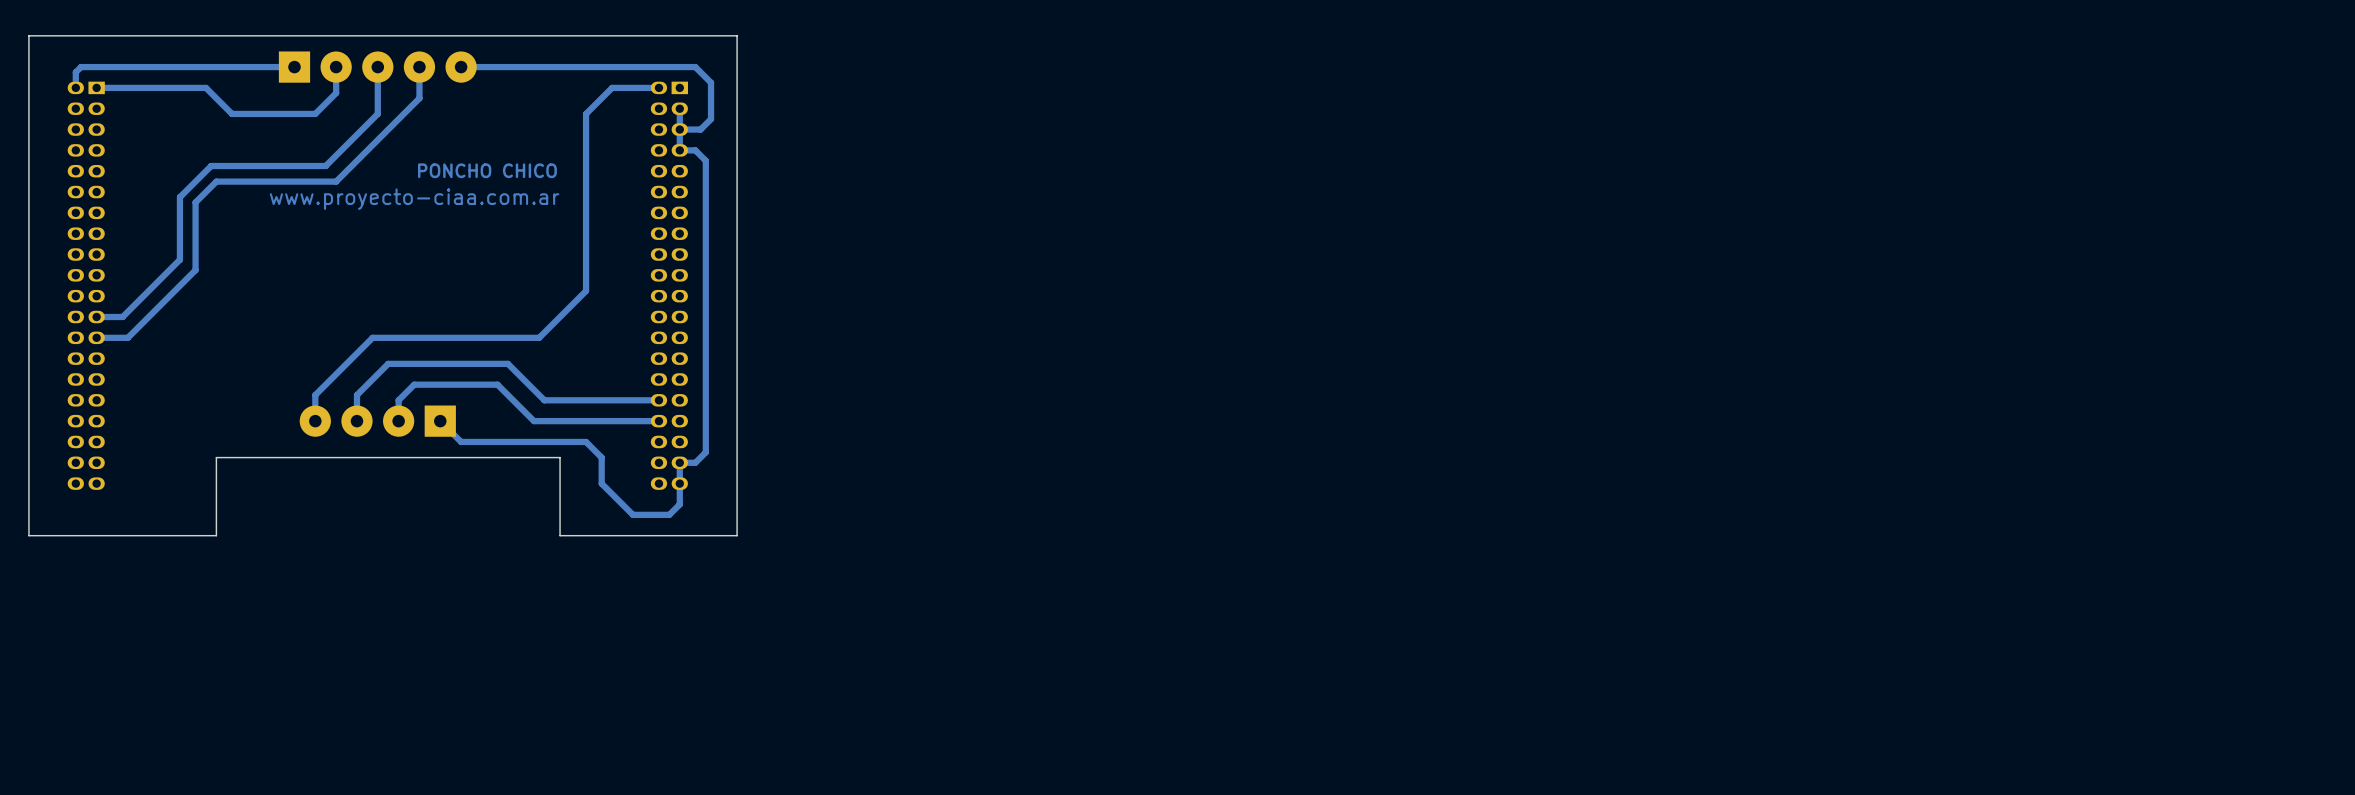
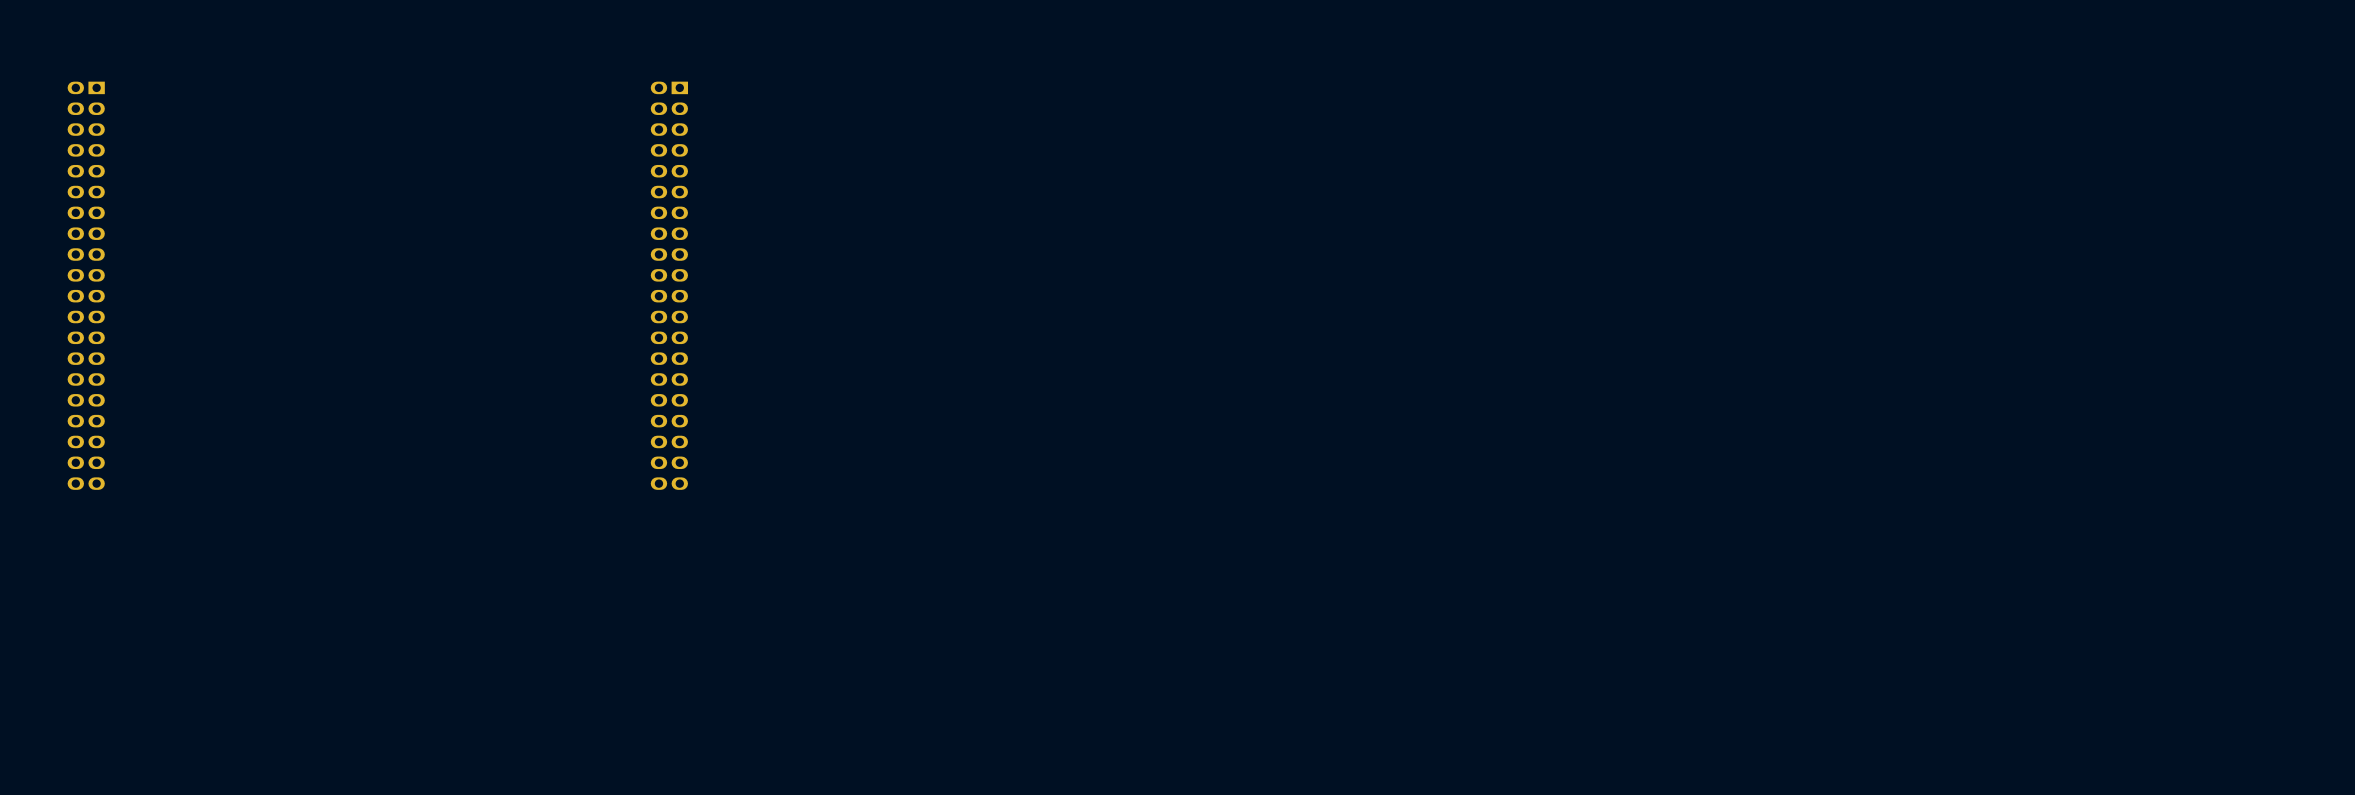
board edge: (737, 35) (28, 35) (28, 535) (216, 535) (216, 457) (560, 457) (560, 535) (737, 535) (737, 35) -> none
bottom track: (294, 67) (81, 67) (75, 72) (75, 87) -> none
bottom track: (336, 67) (336, 93) (315, 113) (232, 113) (205, 87) (96, 87) -> none
bottom track: (377, 67) (377, 113) (325, 166) (211, 166) (179, 197) (179, 259) (122, 317) (96, 317) -> none
part: (377, 67) -> none
bottom track: (419, 67) (419, 98) (336, 181) (216, 181) (195, 202) (195, 270) (127, 337) (96, 337) -> none
bottom track: (461, 67) (695, 67) (711, 82) (711, 119) (700, 129) (679, 129) -> none
bottom track: (658, 87) (612, 87) (586, 113) (586, 290) (539, 337) (372, 337) (315, 395) (315, 421) -> none
bottom track: (679, 108) (679, 150) (695, 150) (705, 160) (705, 452) (695, 462) (679, 462) (679, 504) (669, 514) (632, 514) (601, 483) (601, 457) (586, 441) (461, 441) (440, 421) (440, 431) -> none
text: PONCHO CHICO (487, 170) -> none
text: www.proyecto-ciaa.com.ar (414, 199) -> none
bottom track: (658, 400) (544, 400) (507, 363) (388, 363) (356, 395) (356, 421) -> none
part: (377, 421) -> none
bottom track: (658, 421) (534, 421) (497, 384) (414, 384) (398, 400) (398, 421) -> none

